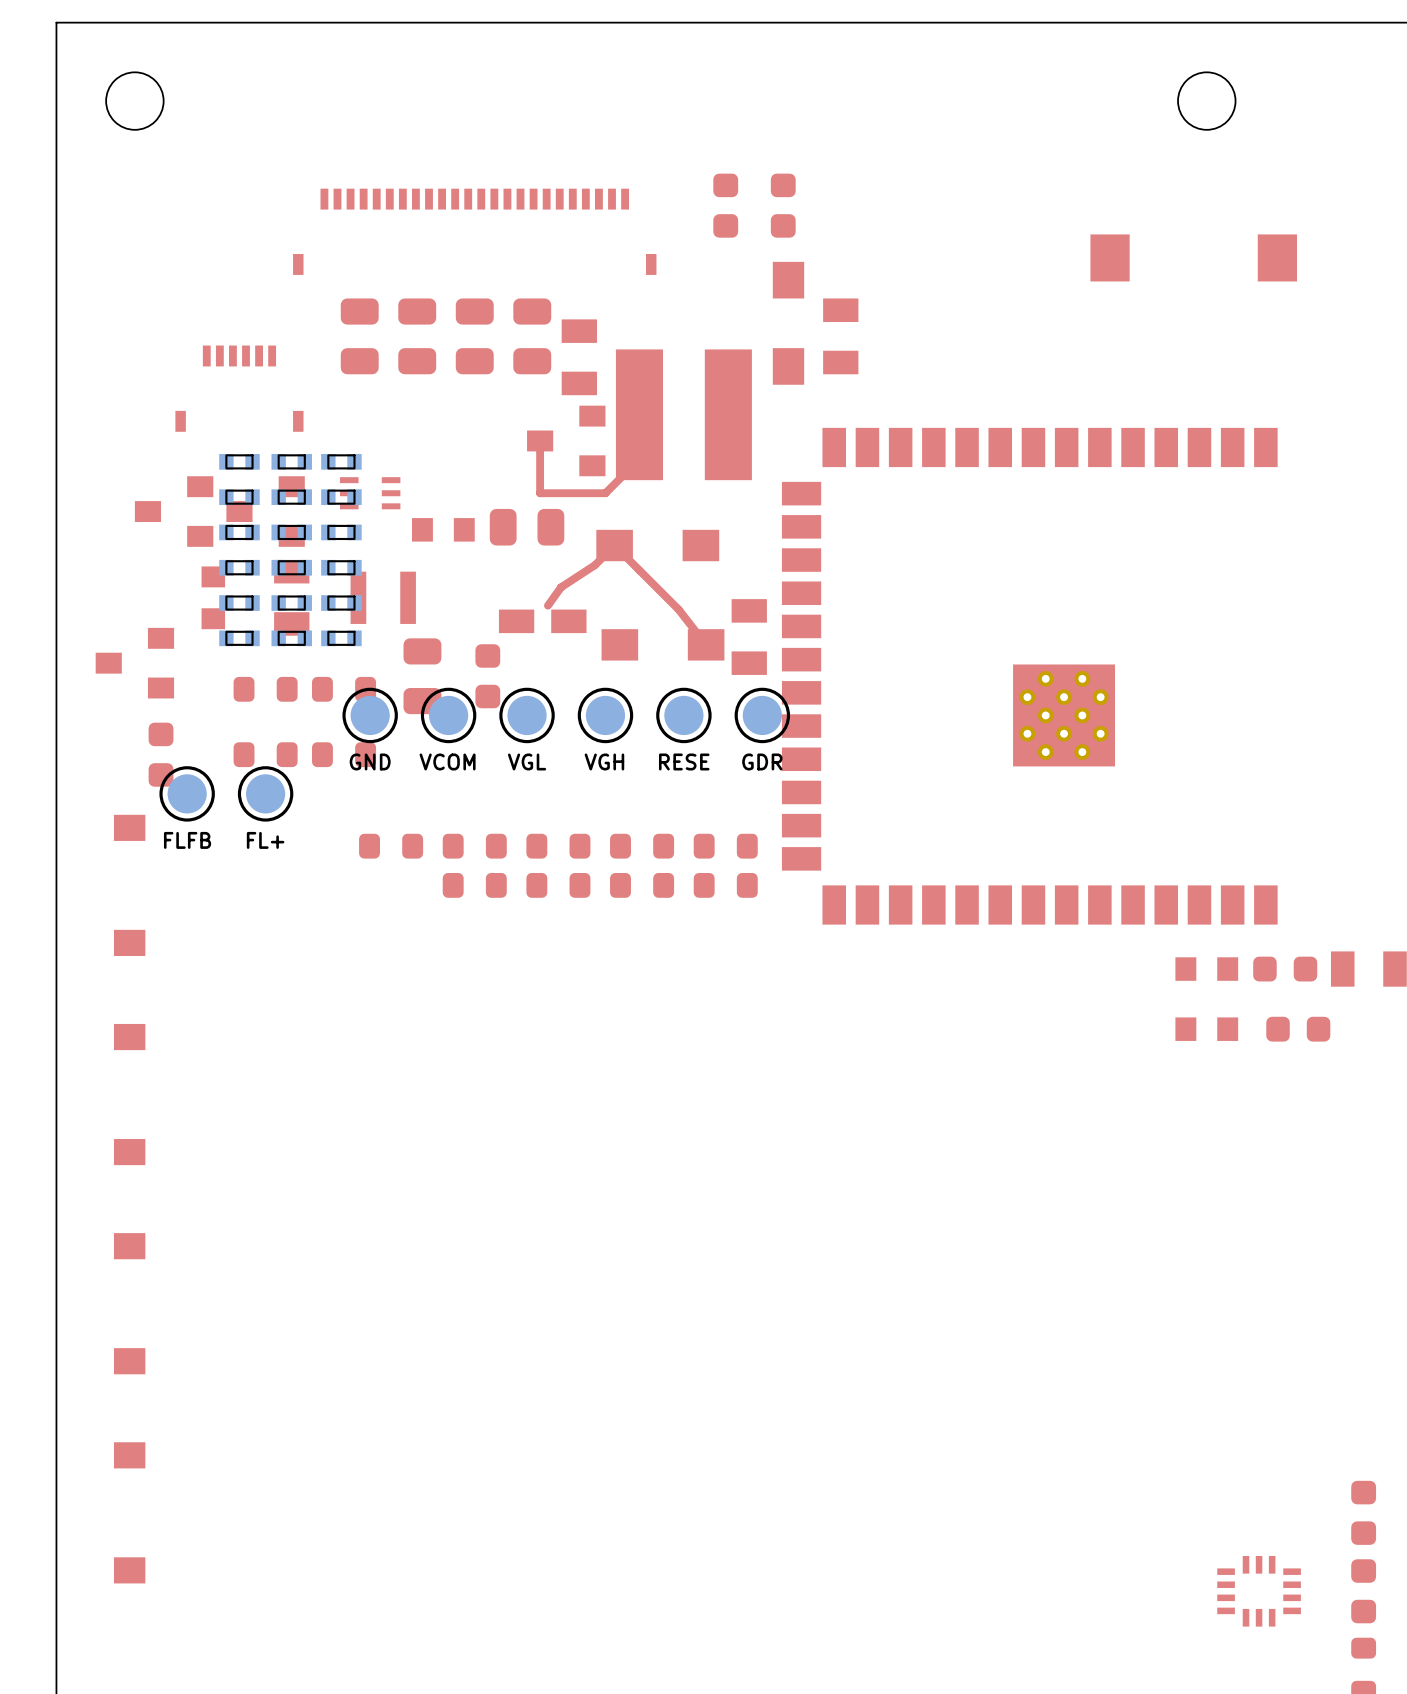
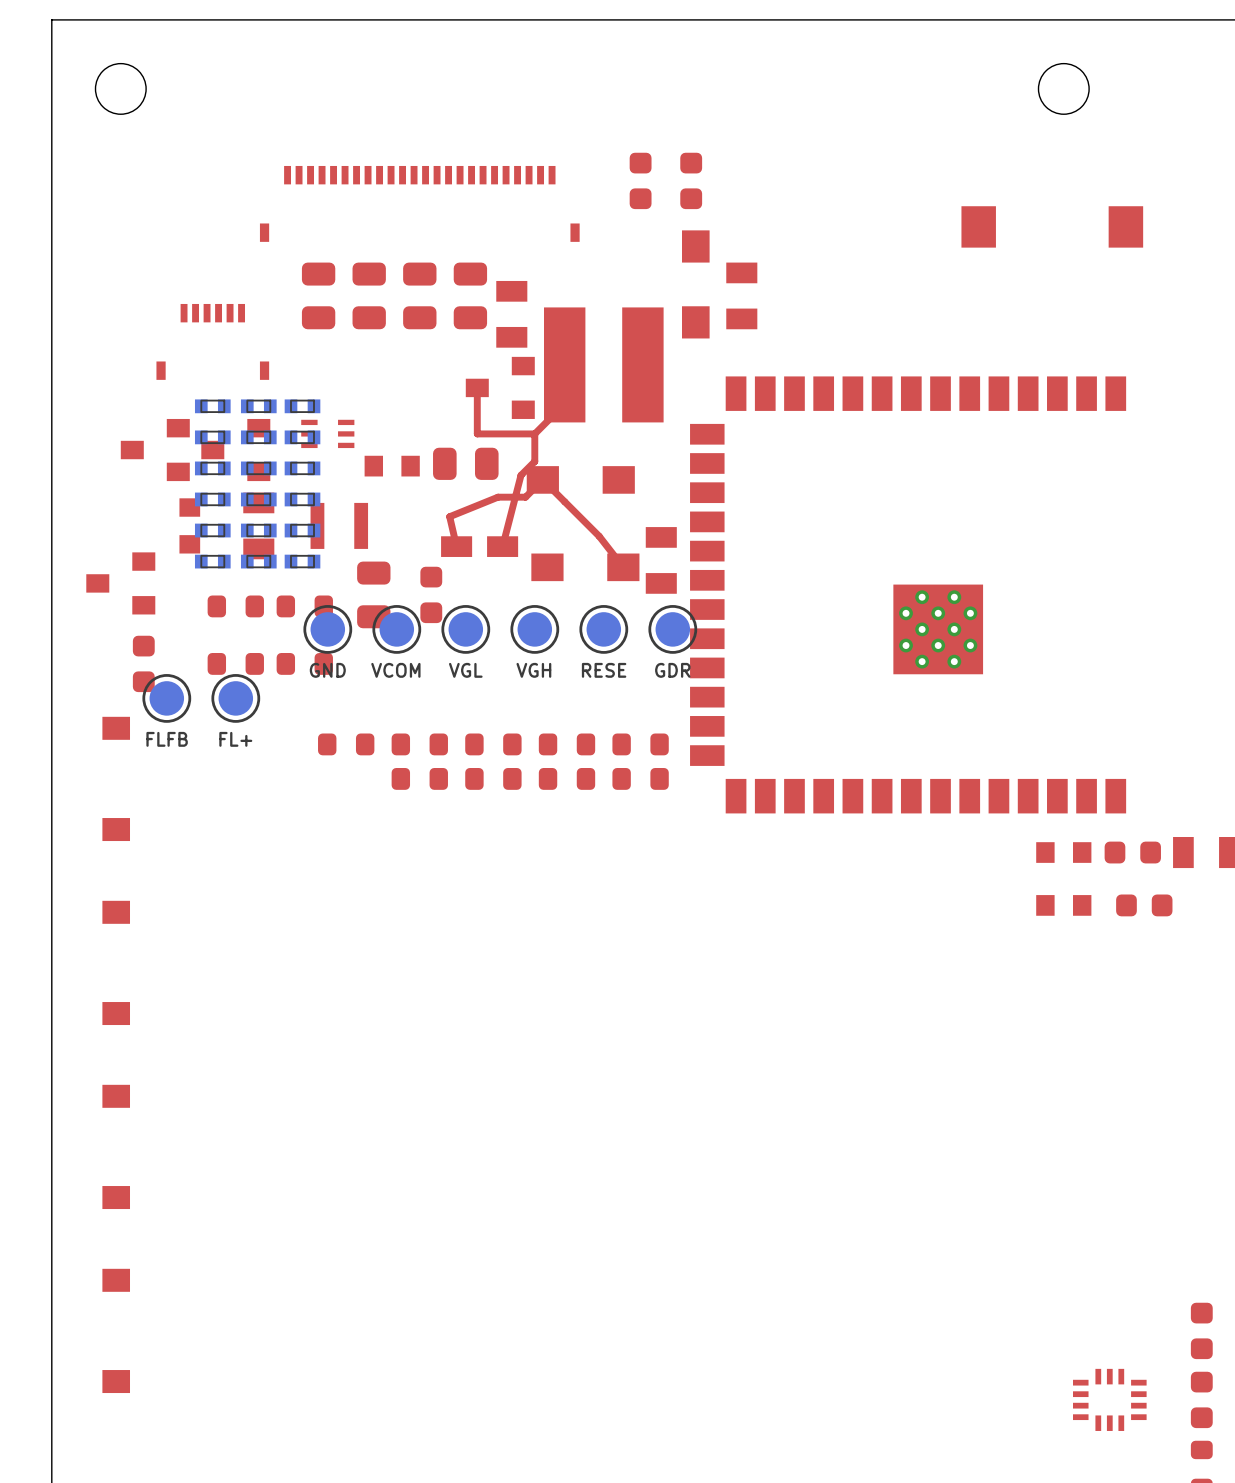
top track: none -> (534, 433) (534, 461) (521, 475) (502, 546)
top track: (595, 565) (561, 587) (547, 605) -> (525, 497) (498, 497) (449, 516) (456, 546)

